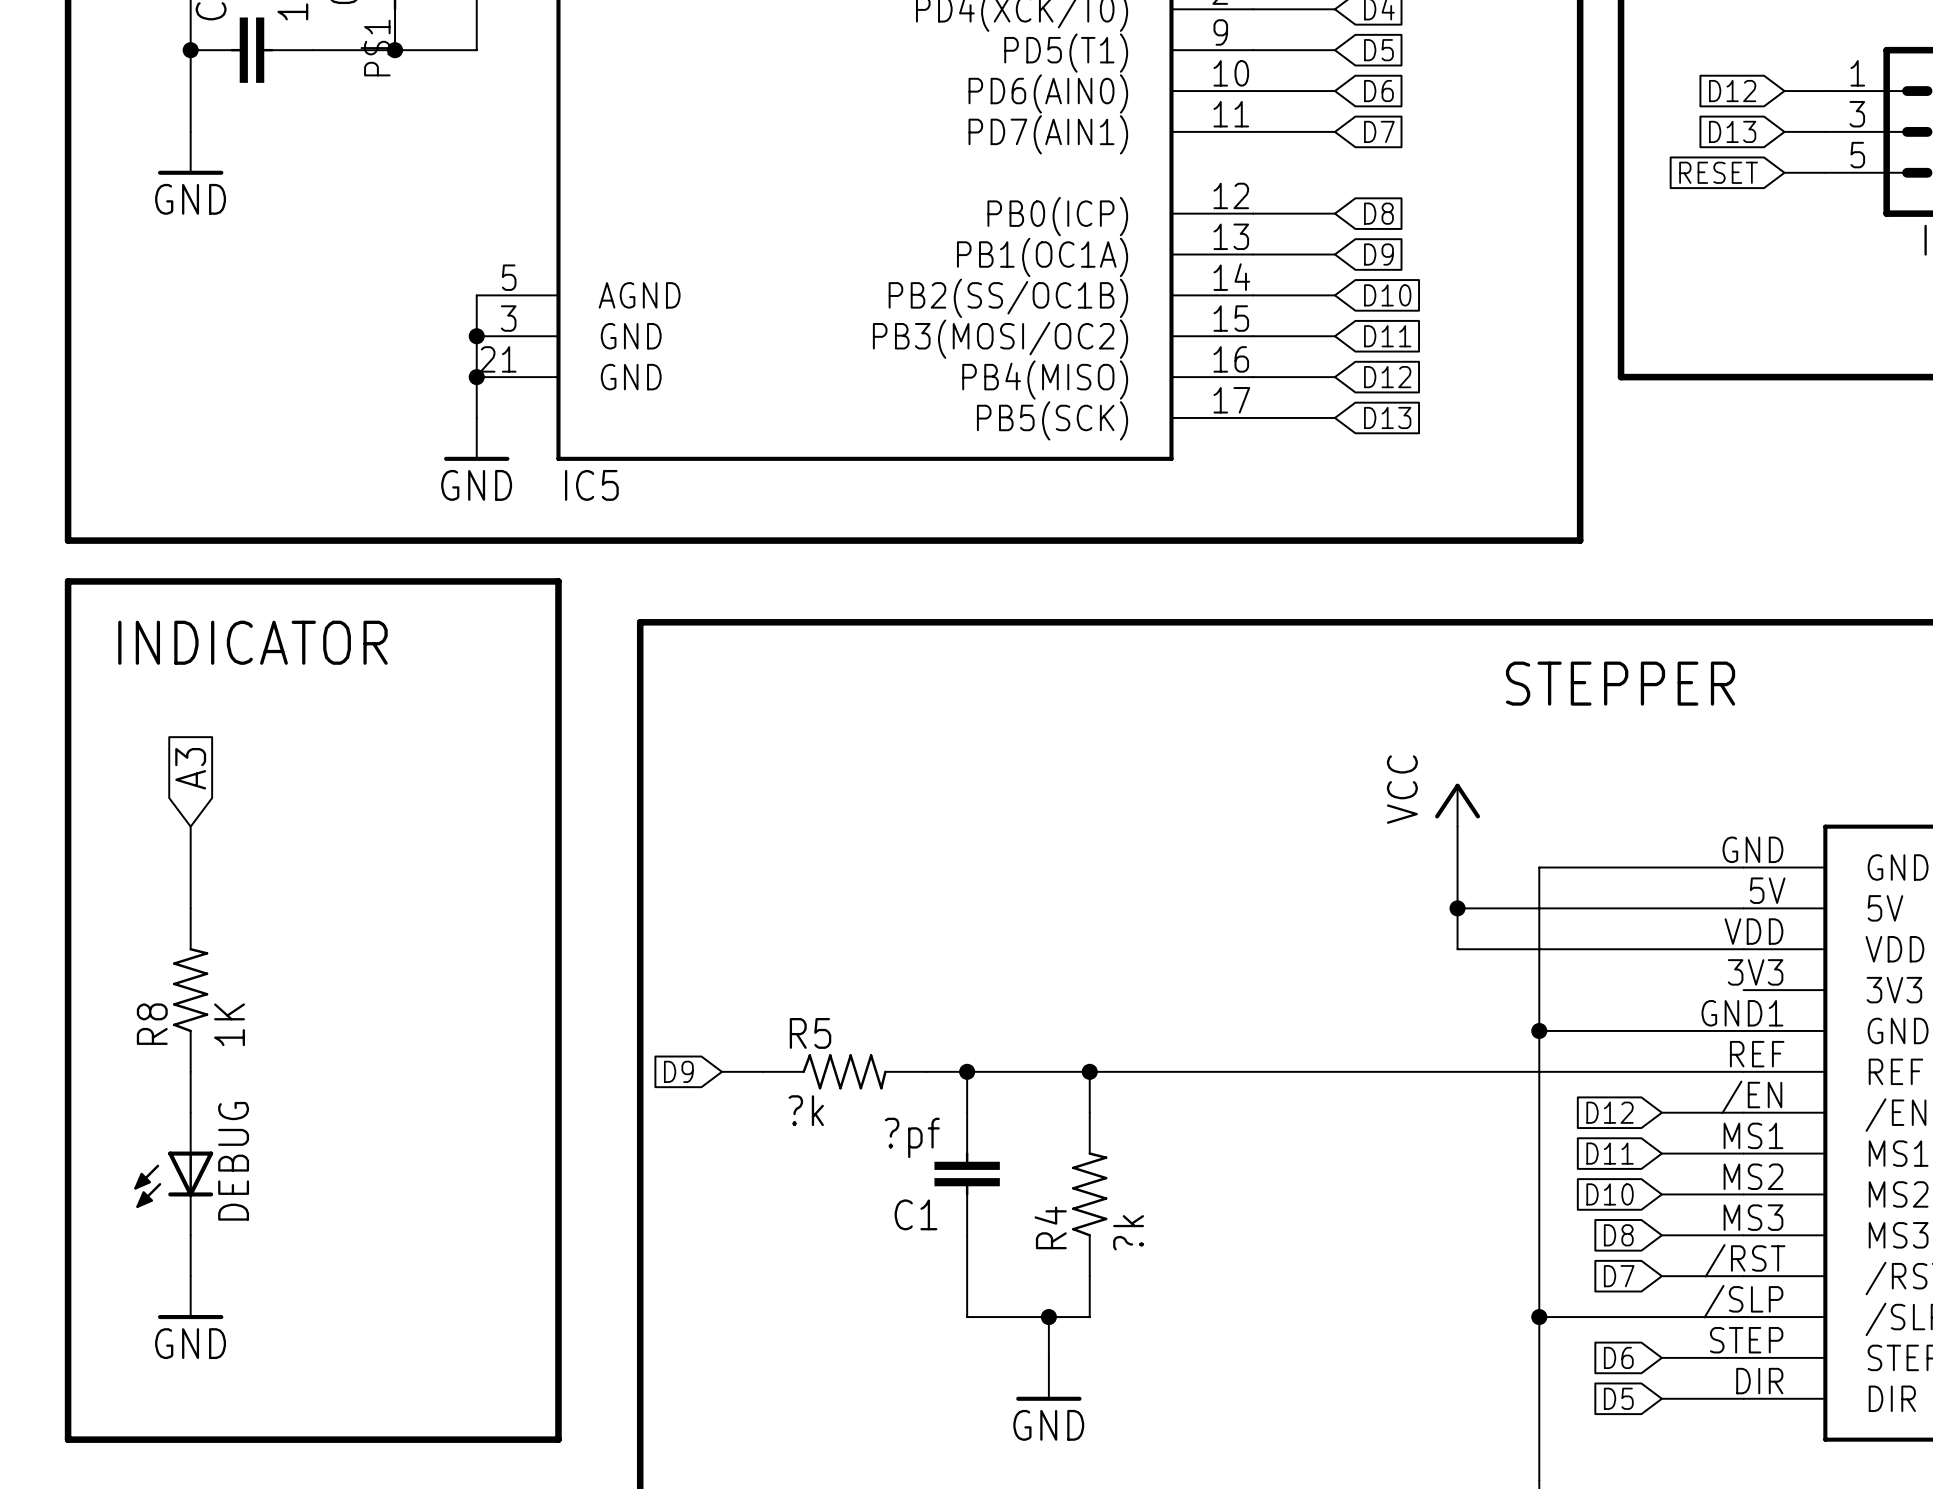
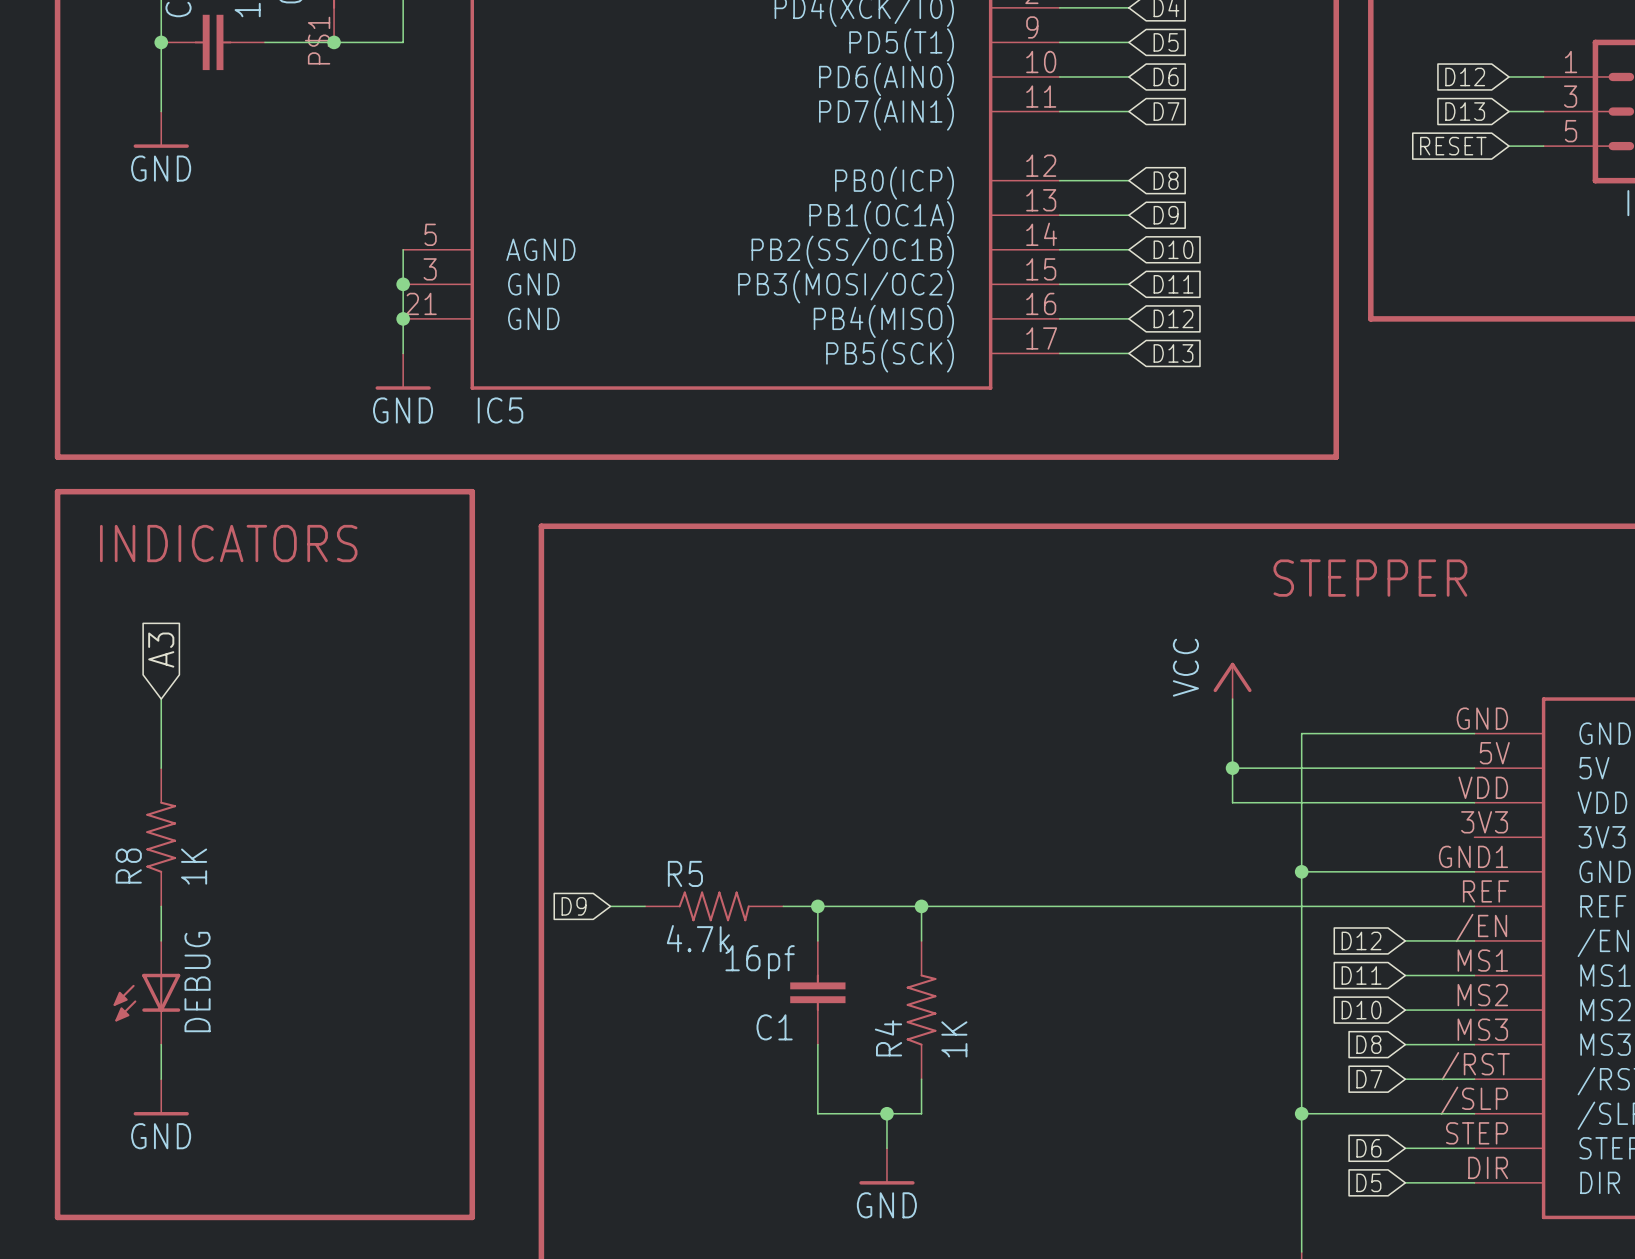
text: INDICATOR (252, 642) -> INDICATORS (228, 543)
R5 value: ?k (806, 1110) -> 4.7k (698, 938)
C1 value: ?pf (912, 1137) -> 16pf (760, 962)
R4 value: ?k (1128, 1232) -> 1K (954, 1039)

